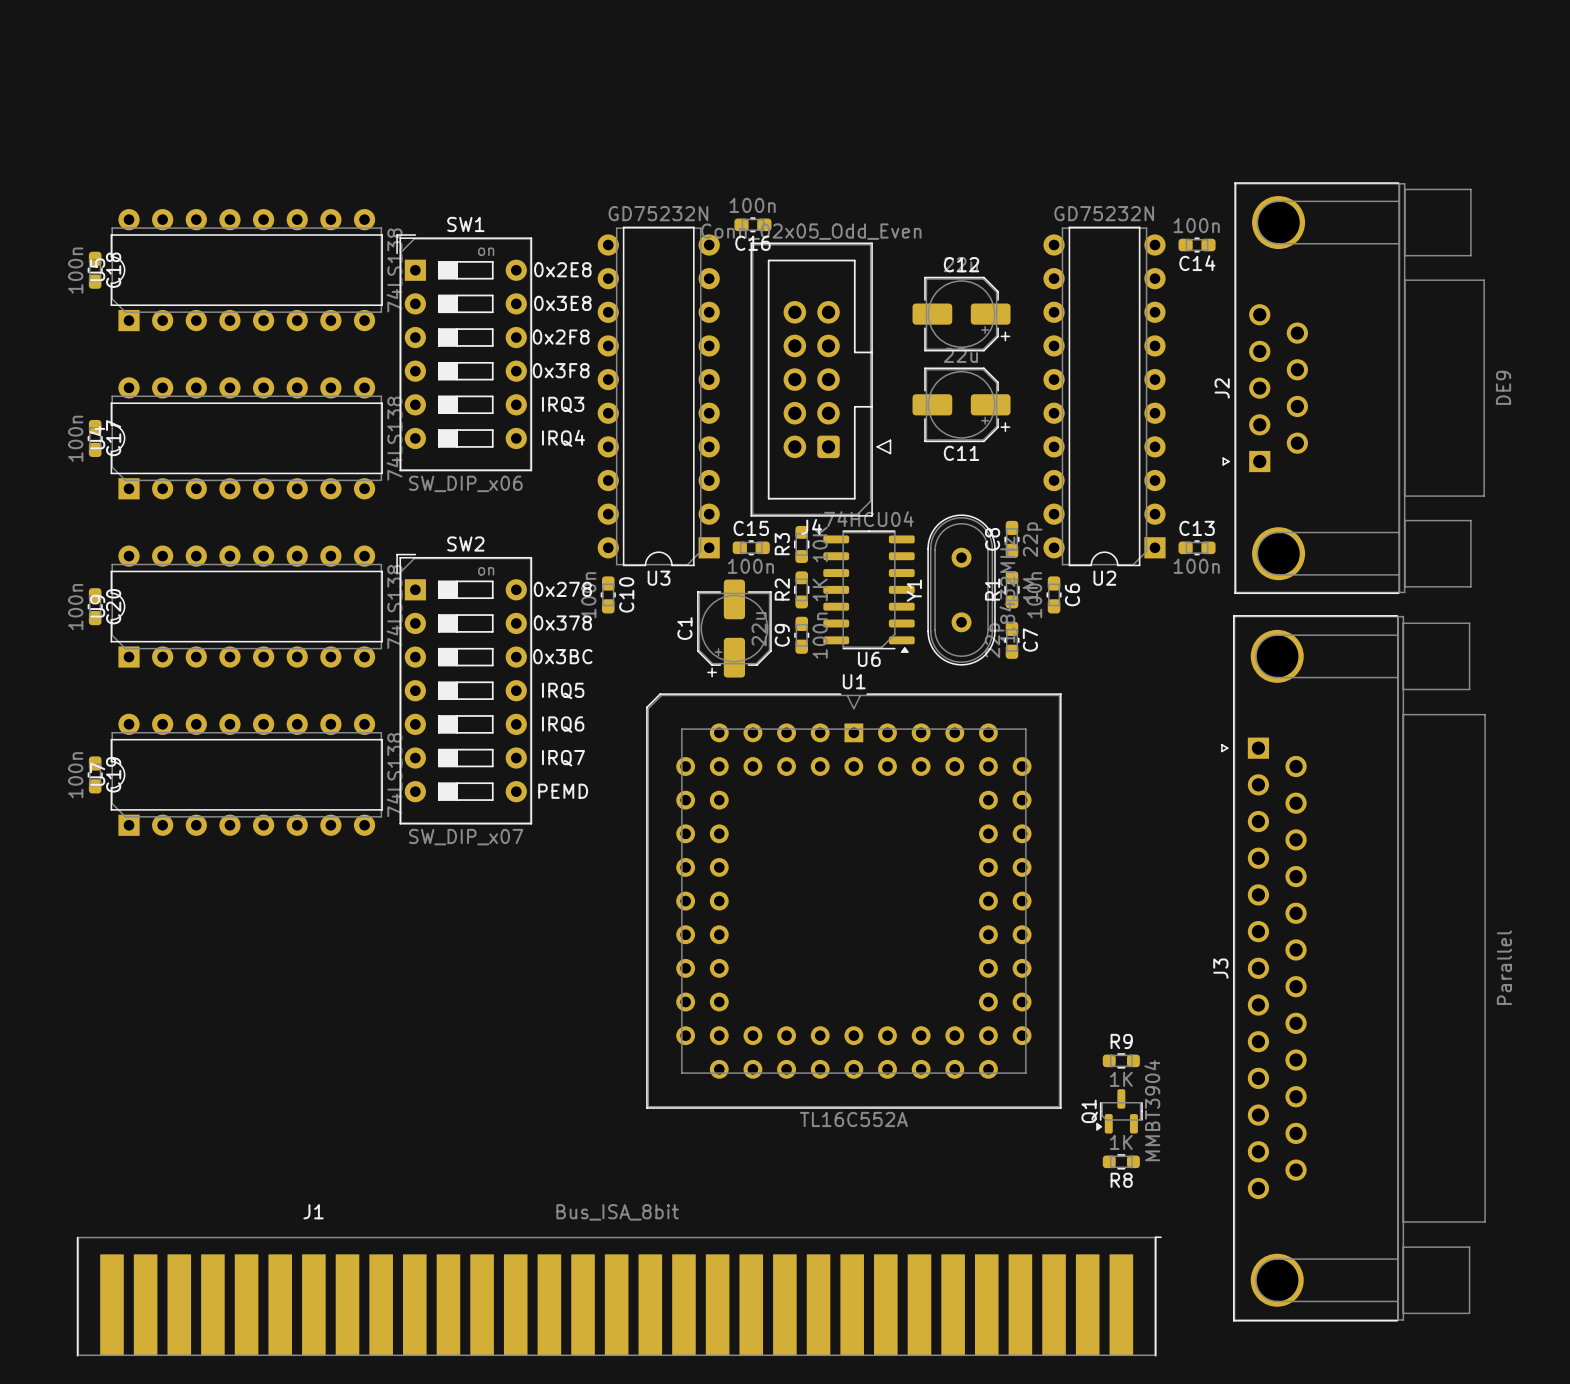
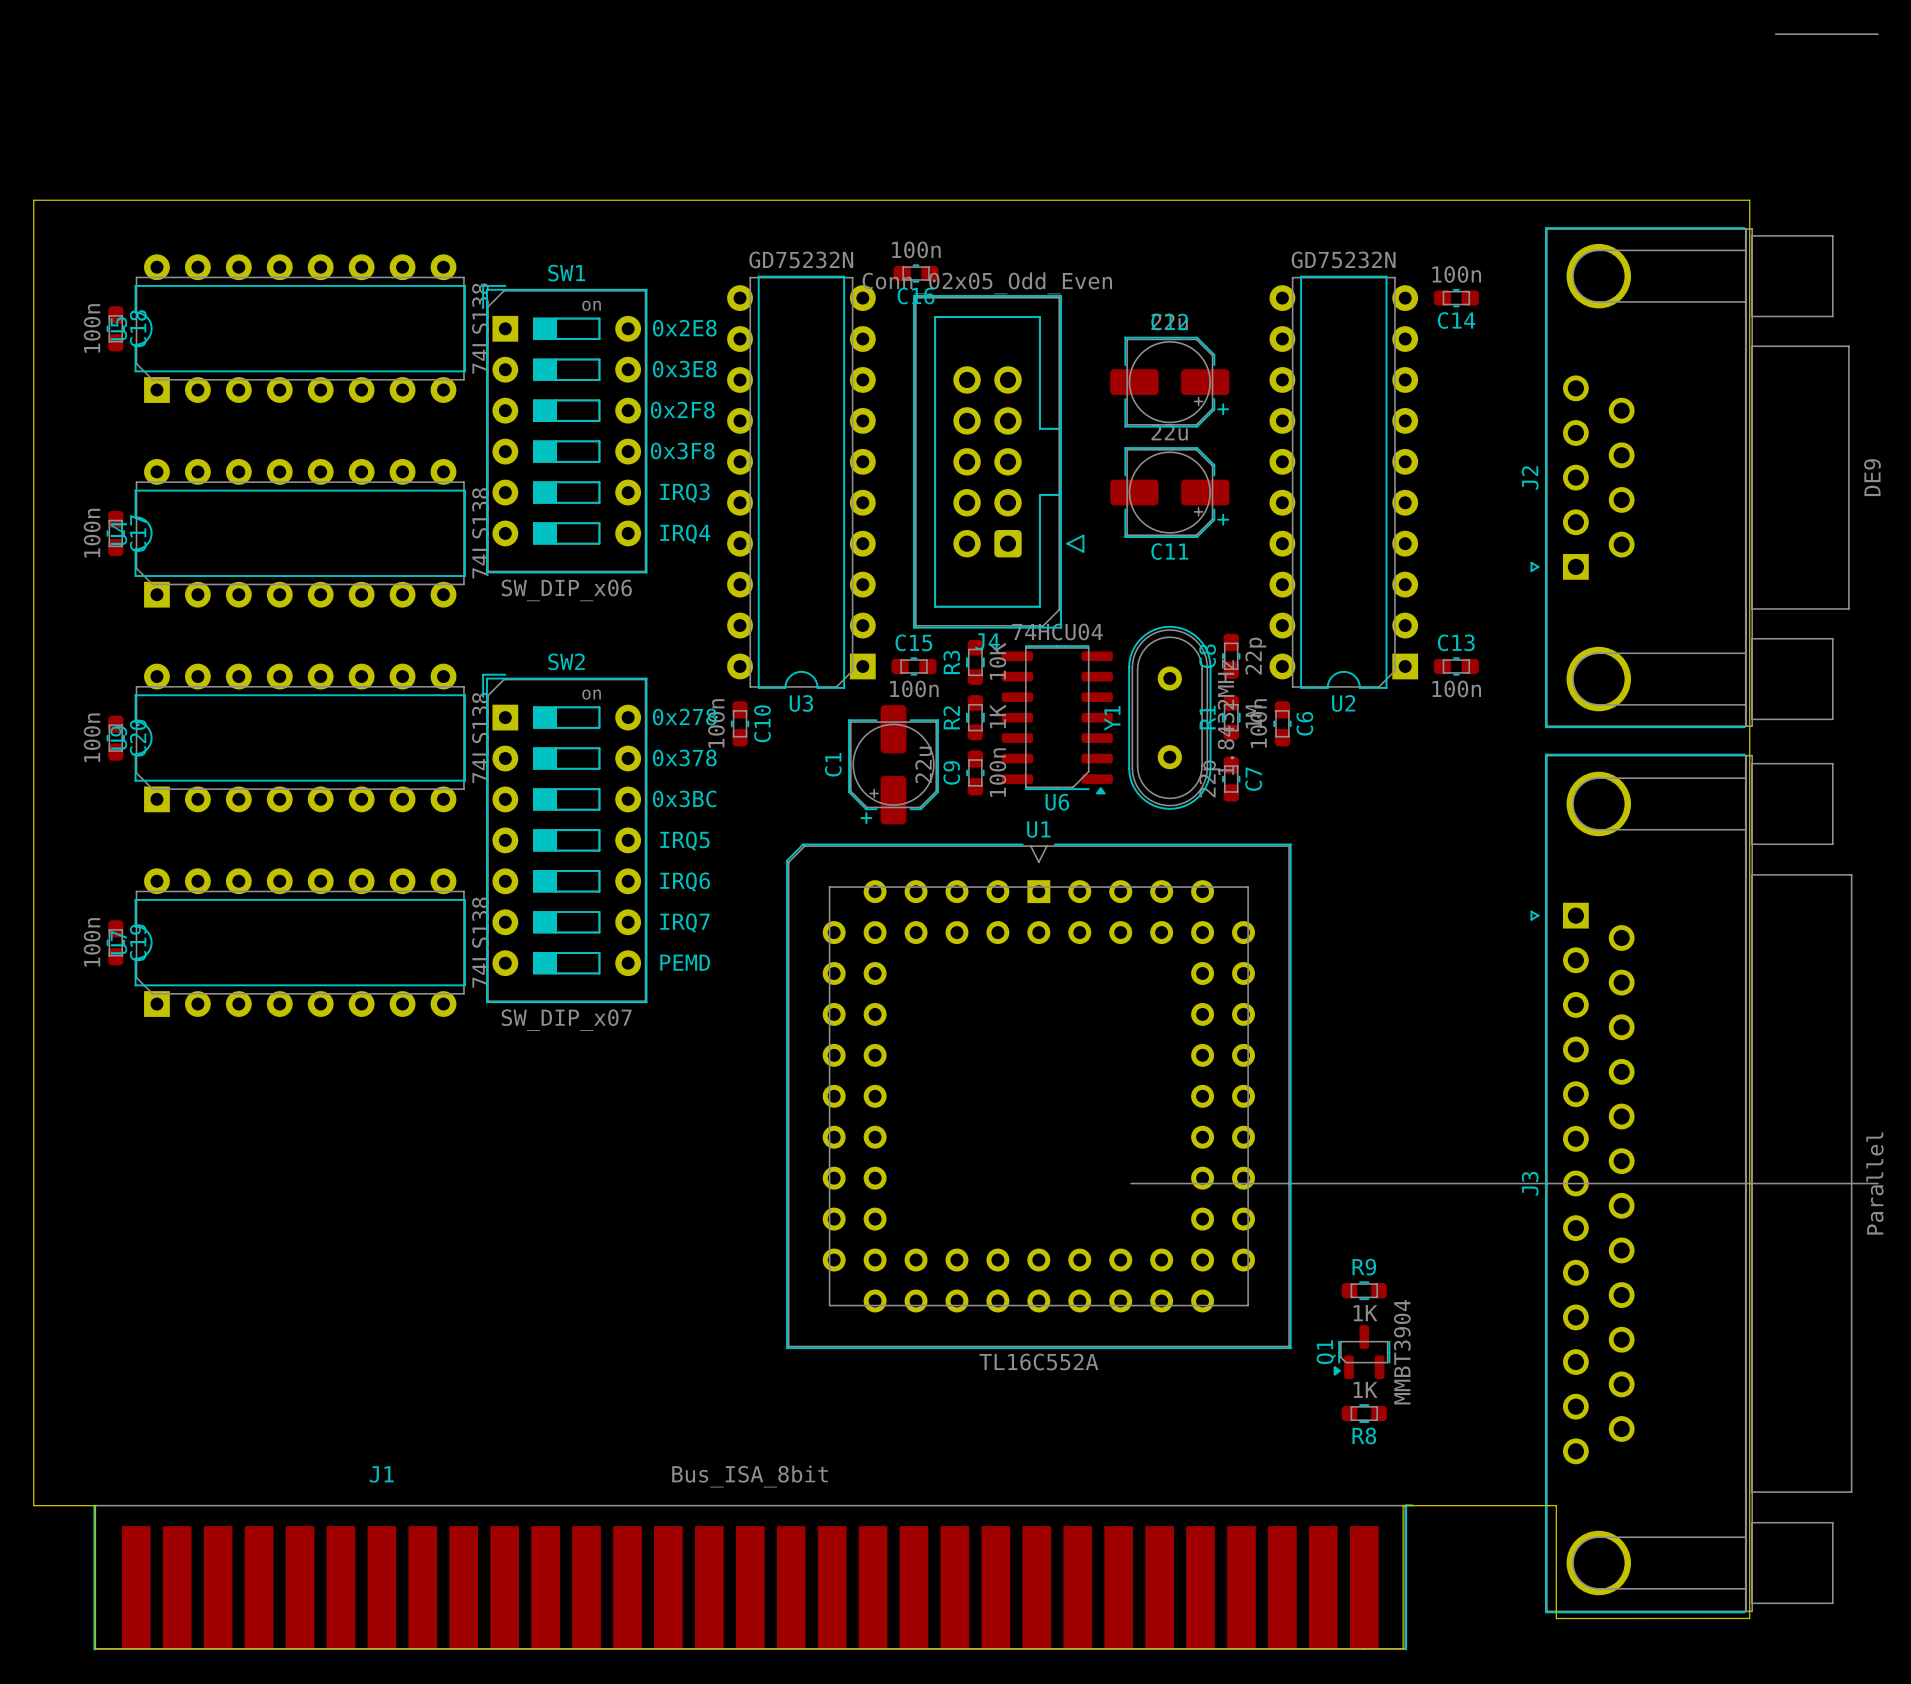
line: none -> (1775, 34) (1877, 34)
board edge: none -> (33, 200) (1749, 200) (1749, 1618) (1556, 1618) (1556, 1505) (1403, 1505) (1403, 1648) (95, 1648) (95, 1505) (33, 1505) (33, 200)
J2 position: (1353, 388) -> (1690, 477)
J3 position: (1353, 968) -> (1691, 1183)
line: none -> (1131, 1183) (1877, 1183)

